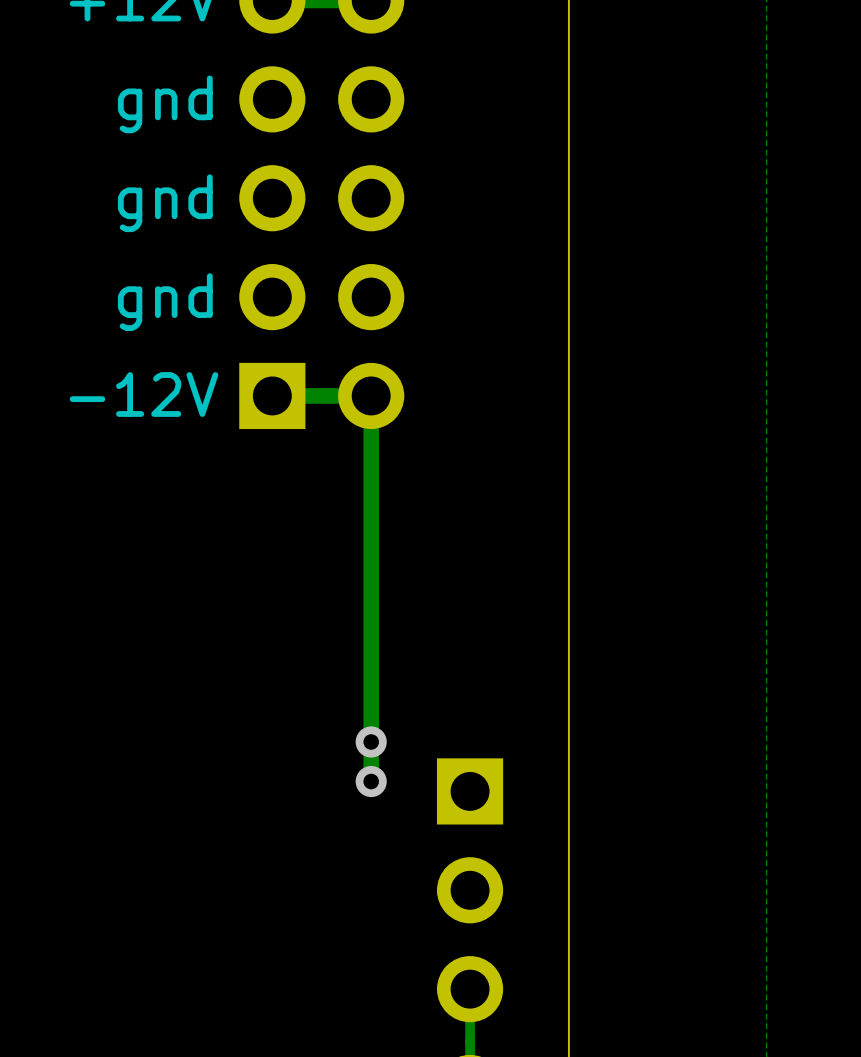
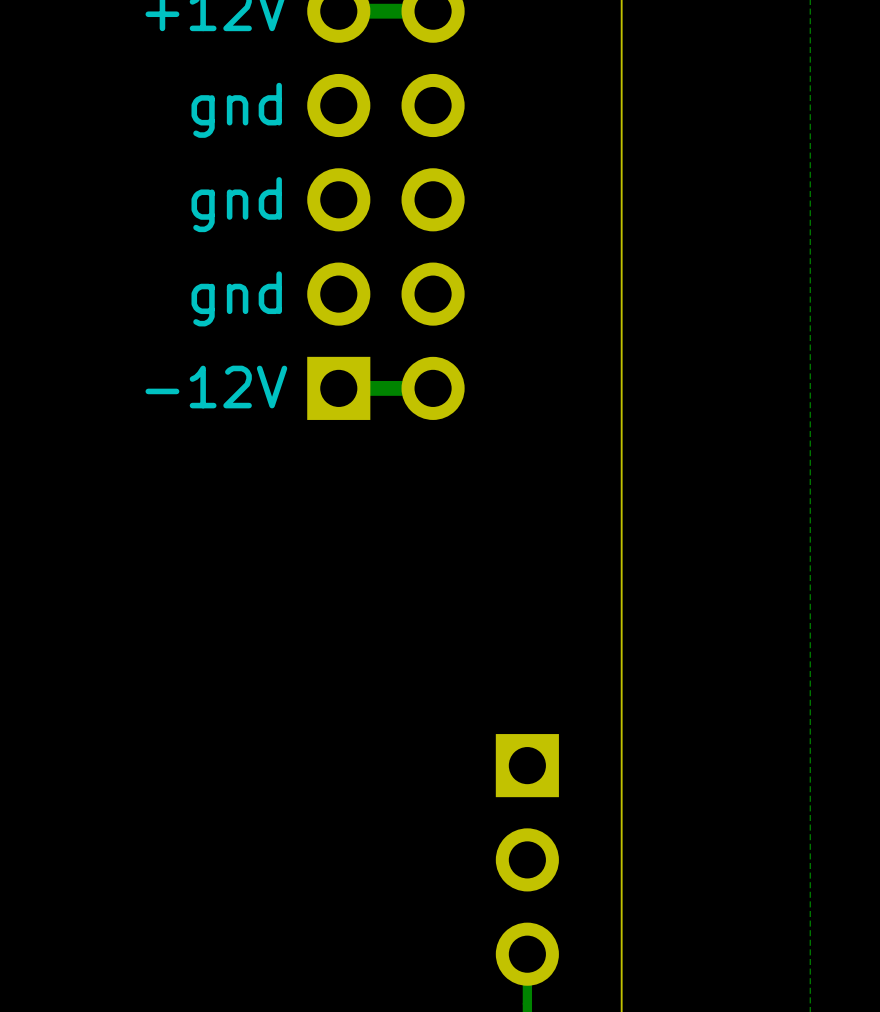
track: (371, 395) (371, 781) -> none
via: (371, 741) -> none
via: (371, 781) -> none

